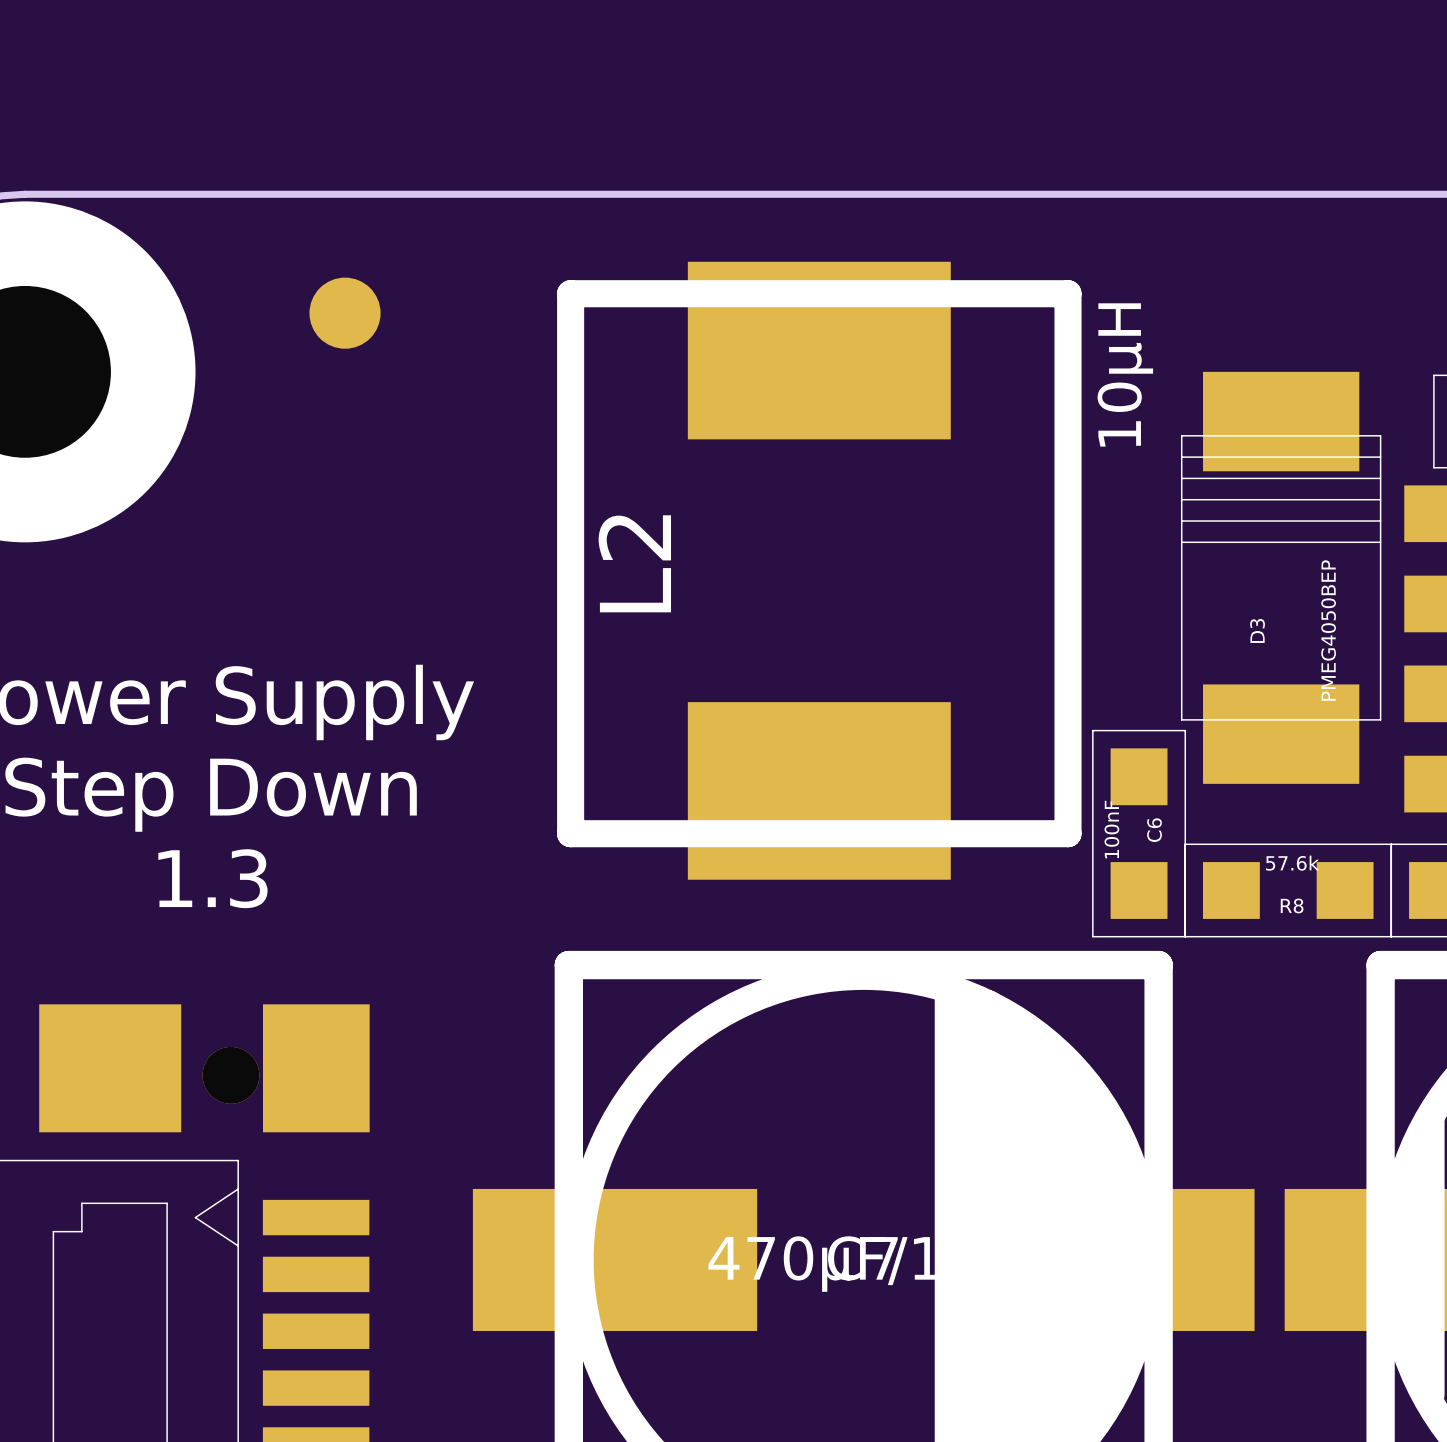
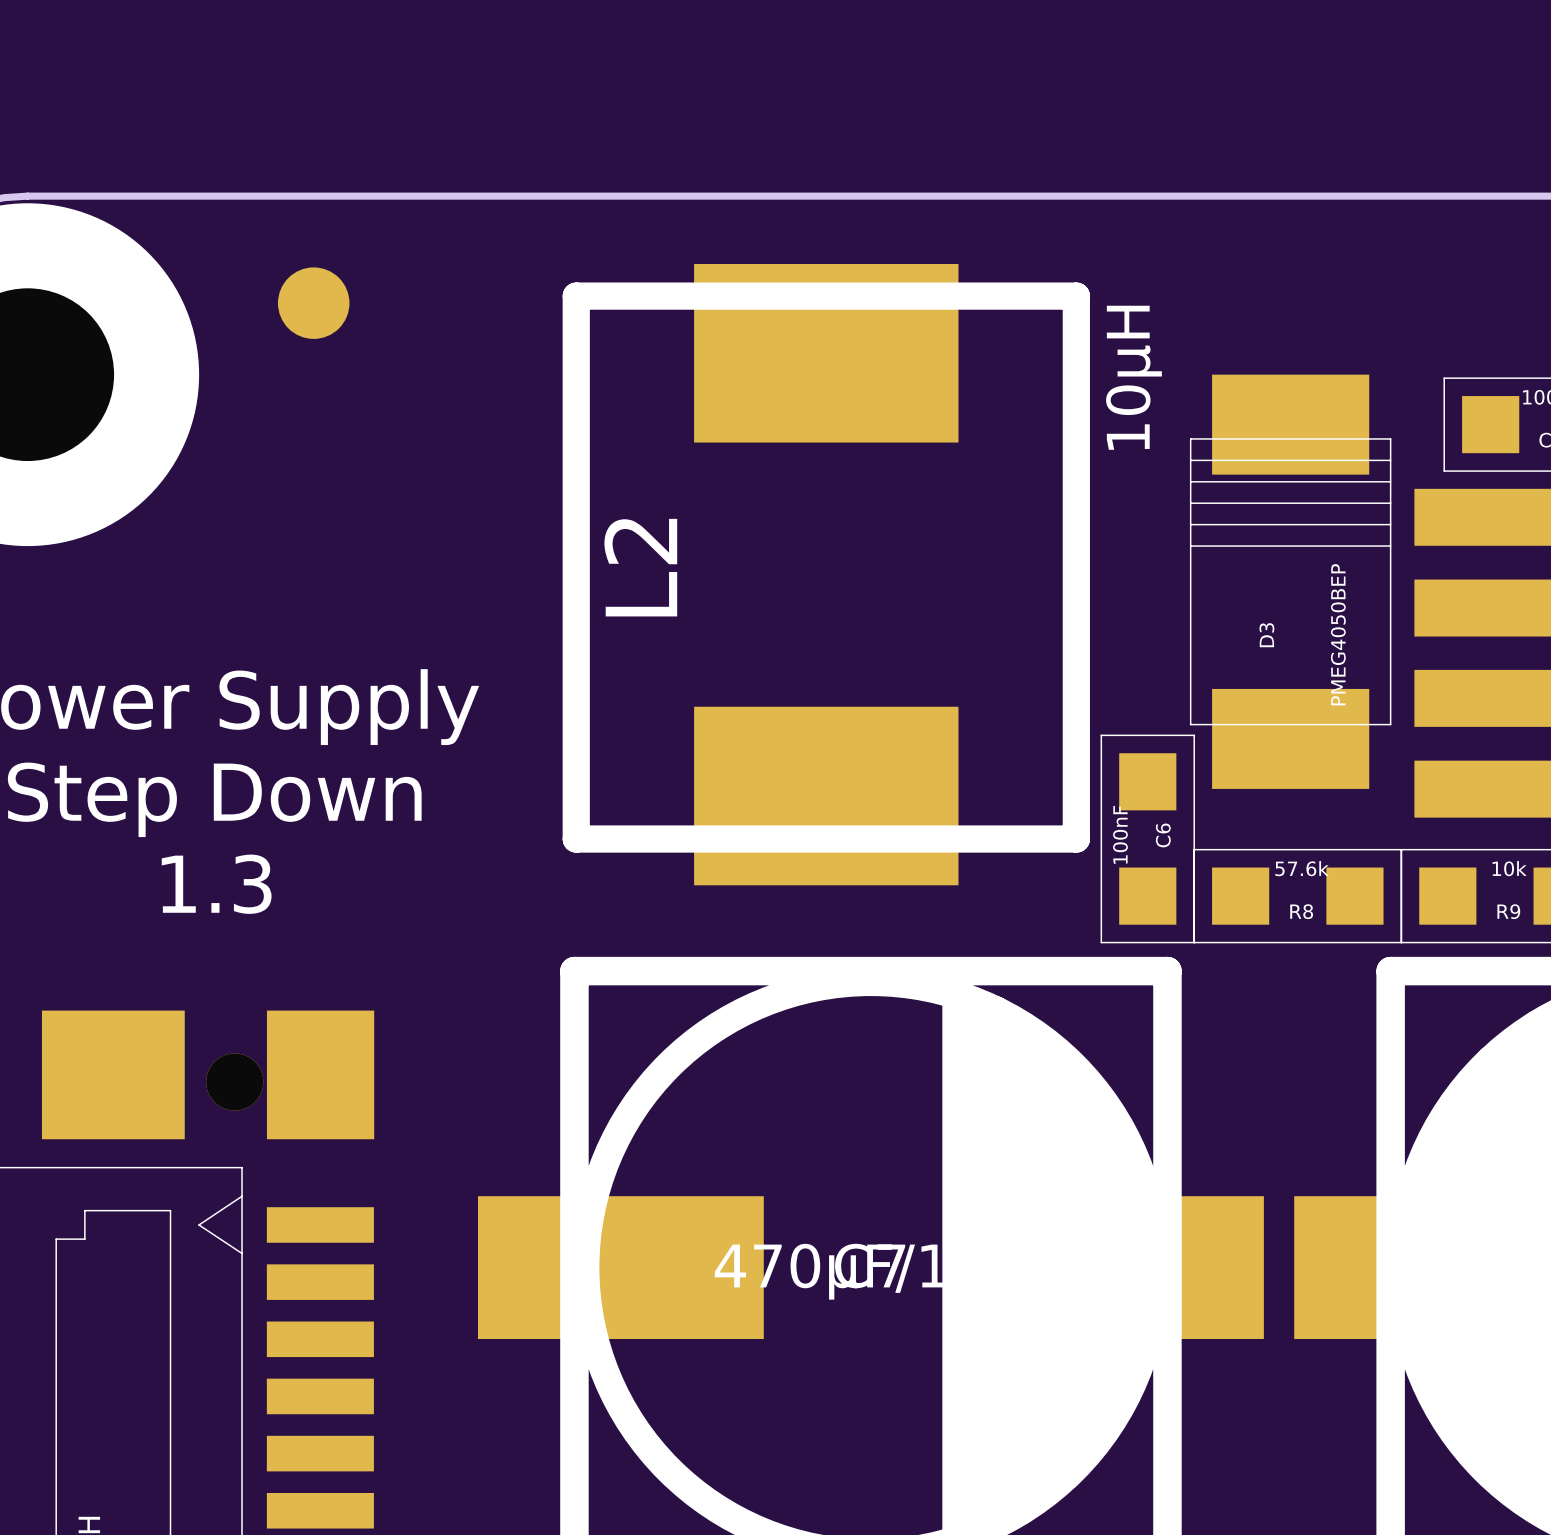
part position: (345, 313) -> (313, 303)

